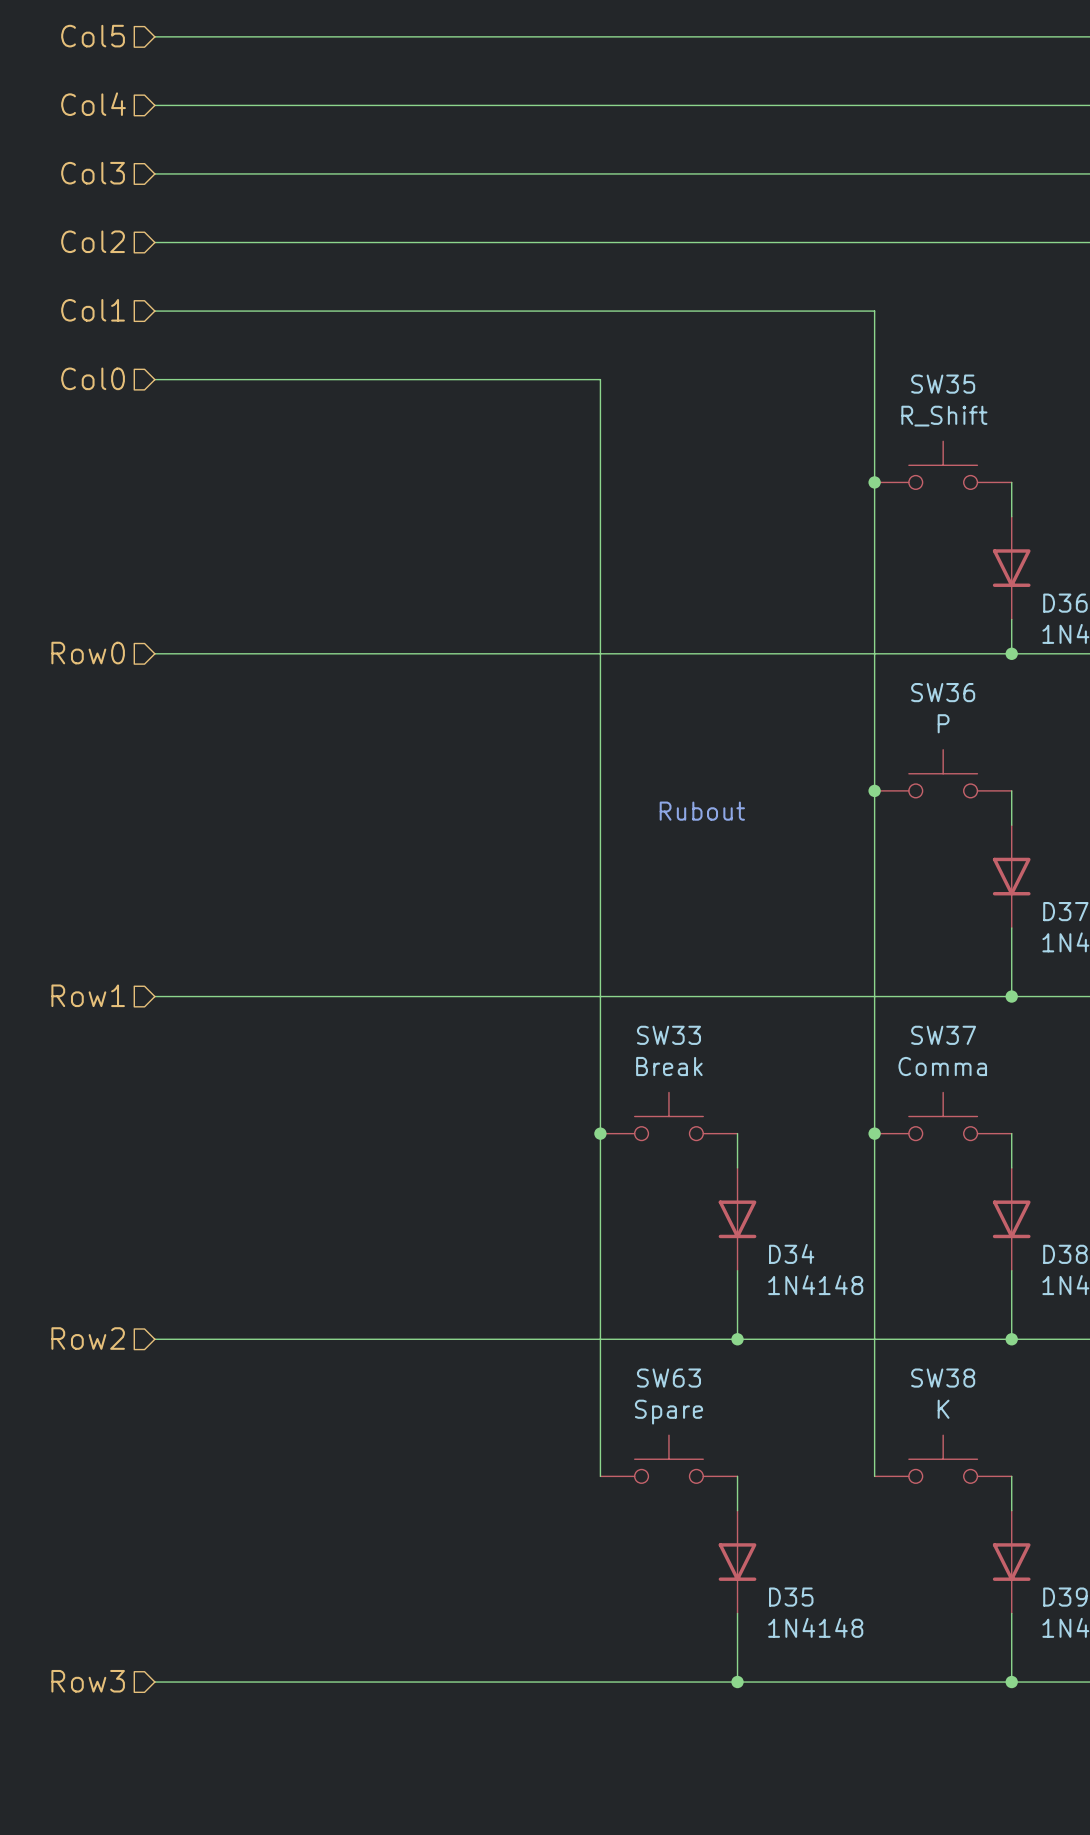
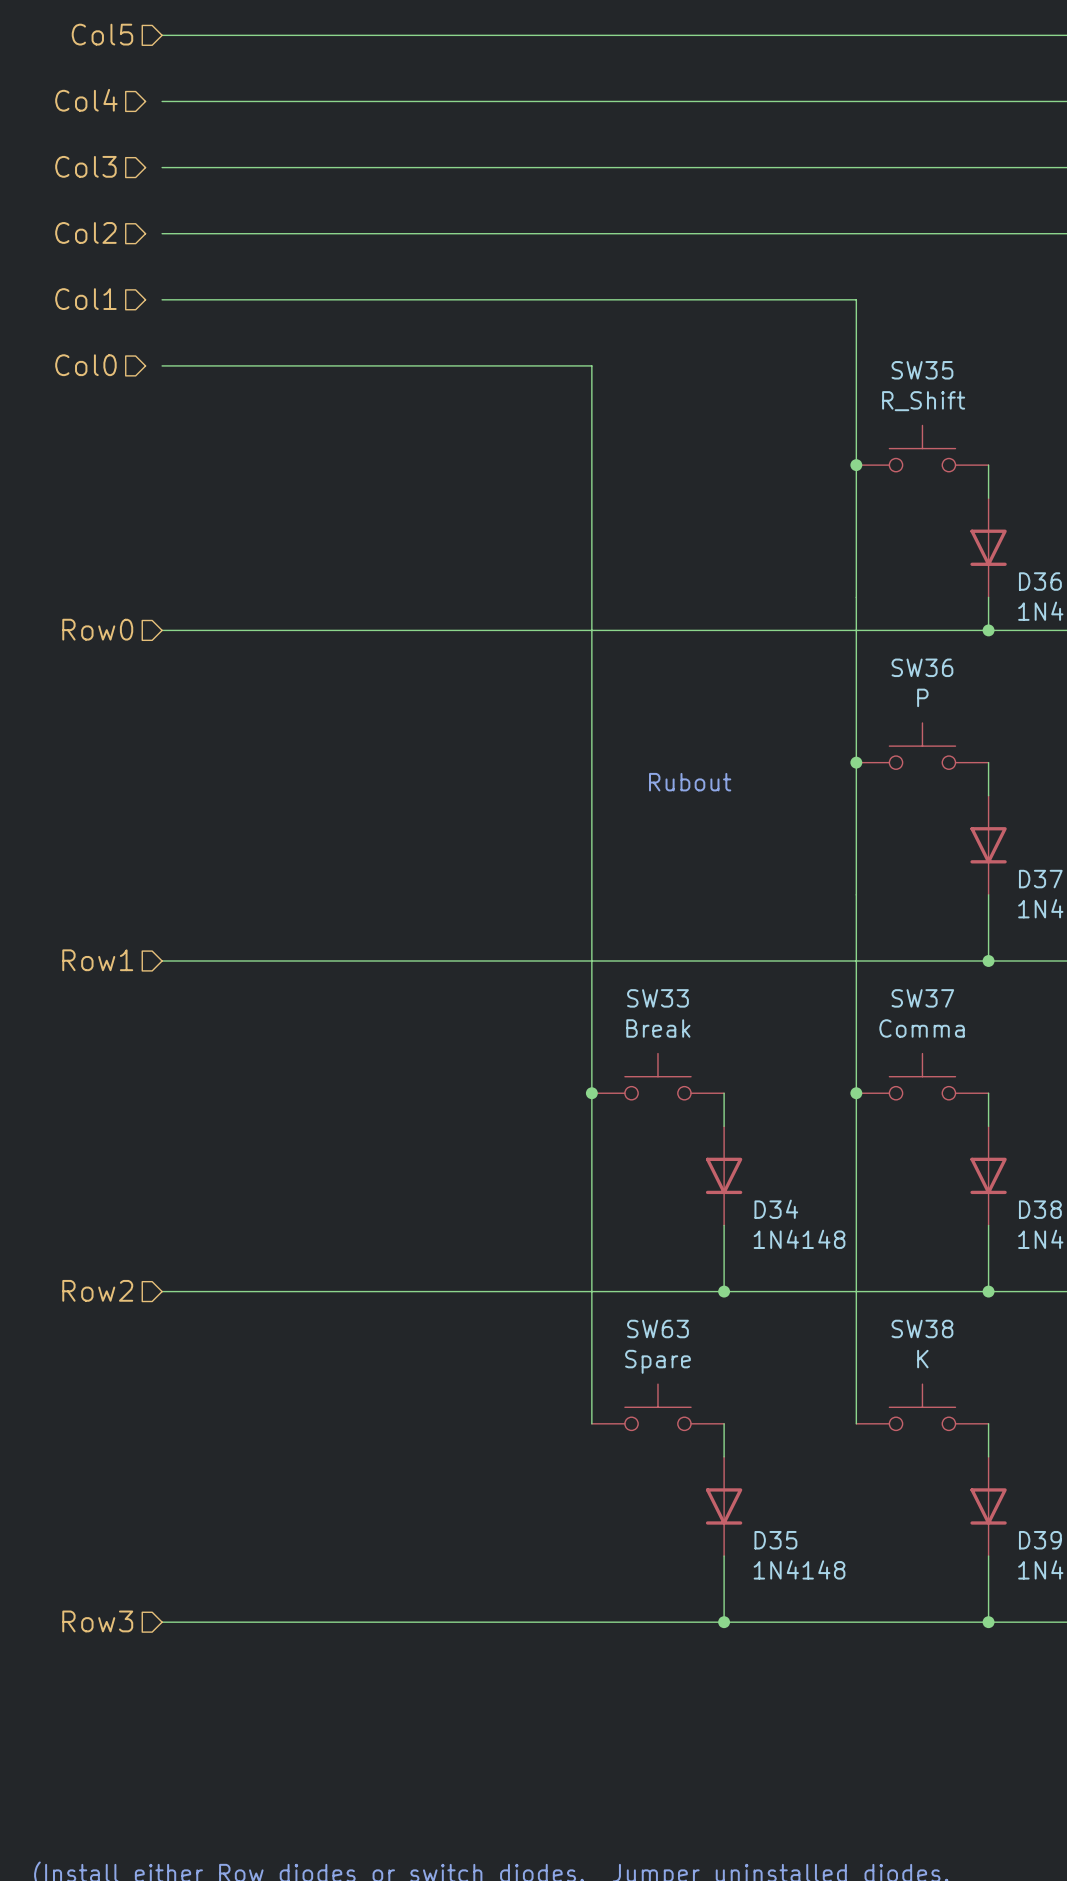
hierarchical label position: Col4 (93, 104) -> Col4 (86, 100)
hierarchical label position: Col3 (93, 173) -> Col3 (85, 166)
hierarchical label position: Col2 (93, 241) -> Col2 (85, 232)
hierarchical label position: Col1 (93, 310) -> Col1 (85, 299)
hierarchical label position: Col0 (93, 378) -> Col0 (85, 365)

